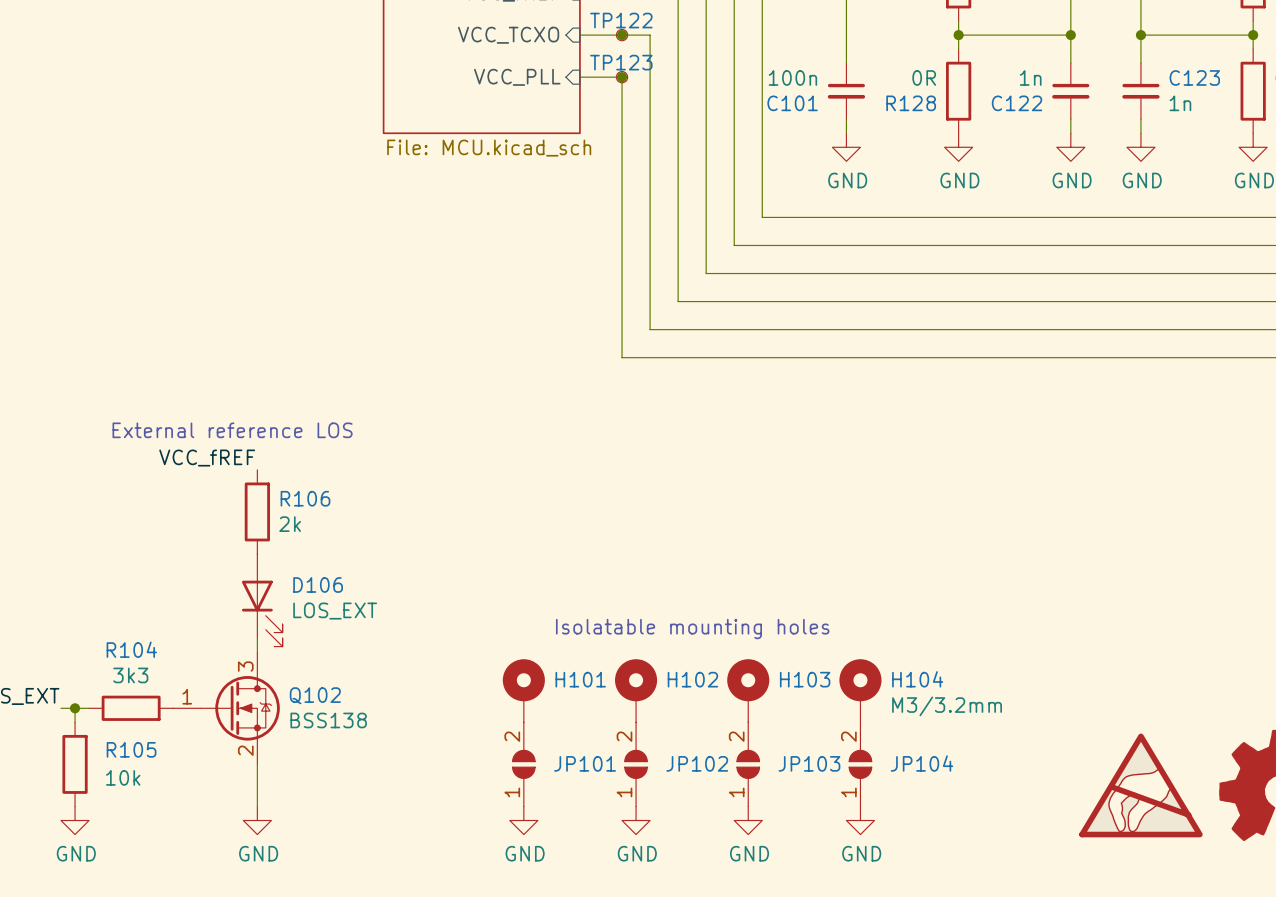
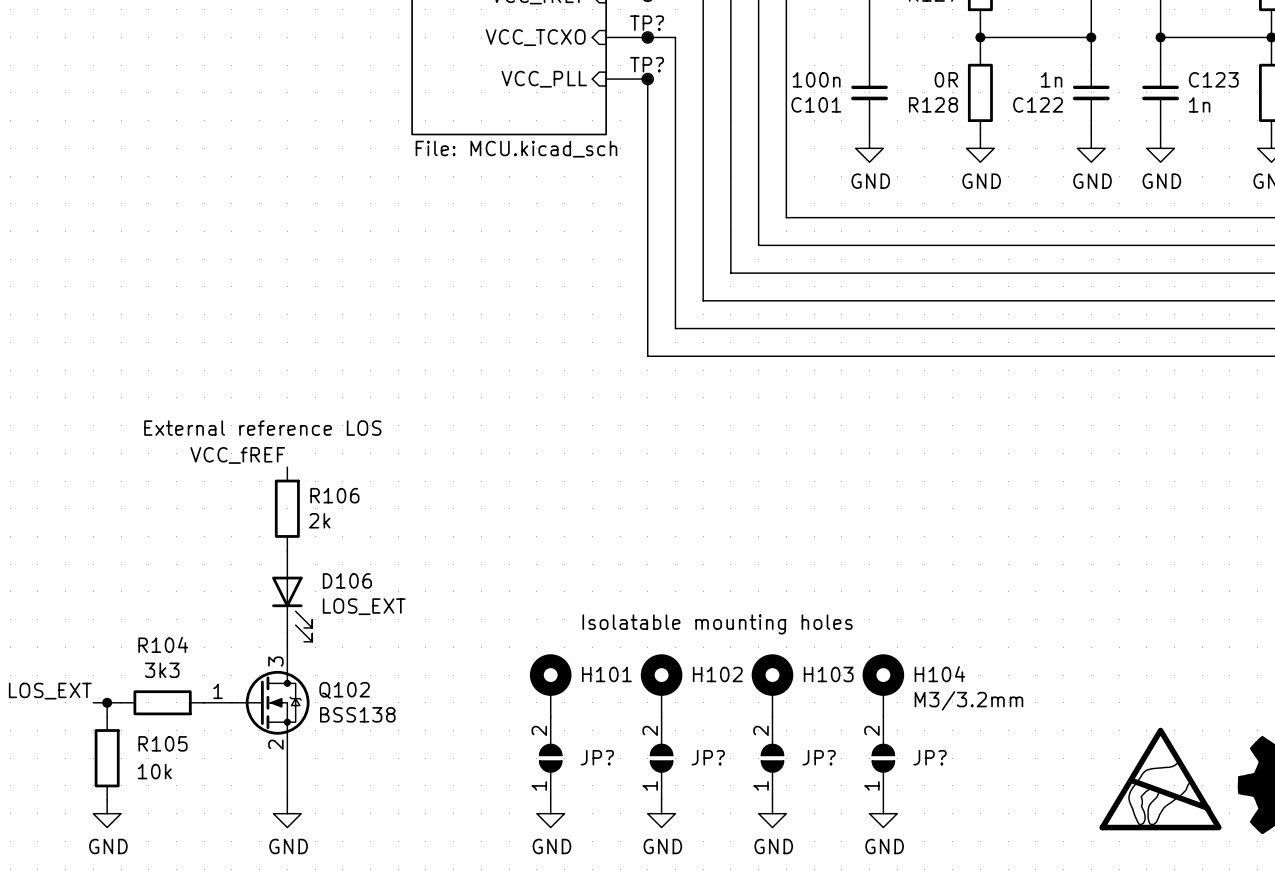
TP122 name: TP122 (621, 20) -> TP? (647, 23)
TP123 name: TP123 (621, 62) -> TP? (647, 64)
JP101 name: JP101 (585, 763) -> JP? (597, 757)
JP102 name: JP102 (697, 763) -> JP? (708, 757)
JP103 name: JP103 (809, 763) -> JP? (819, 757)
JP104 name: JP104 (922, 763) -> JP? (930, 757)

